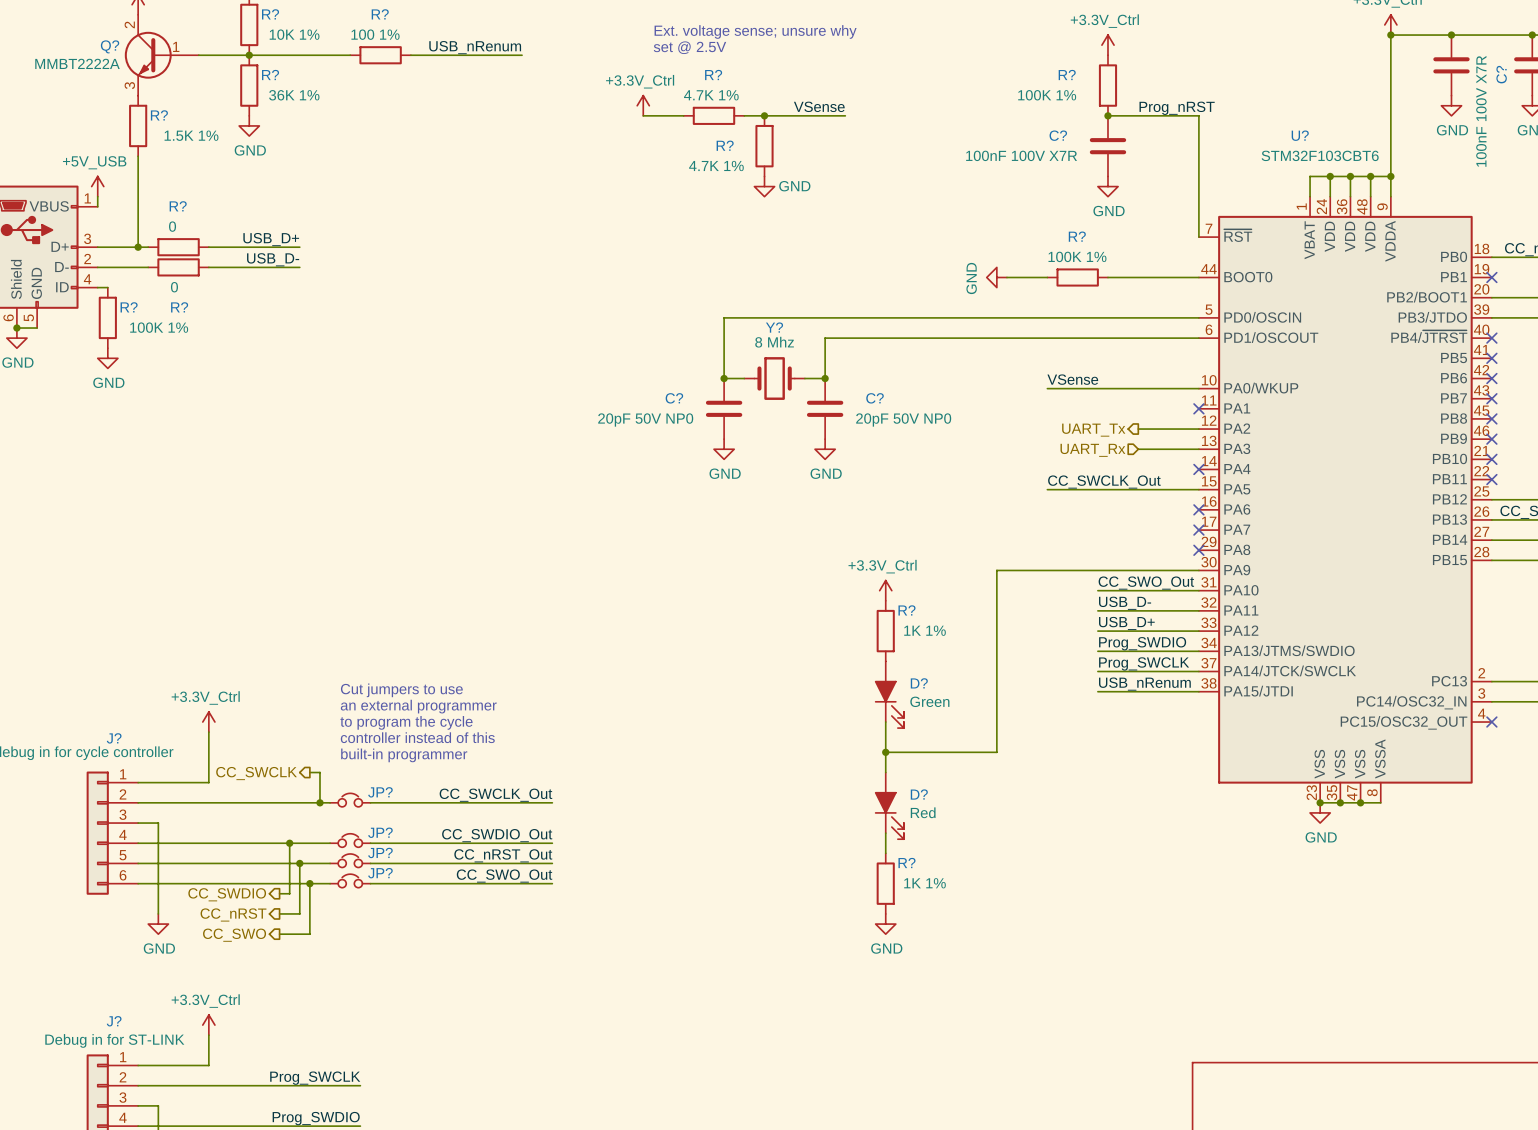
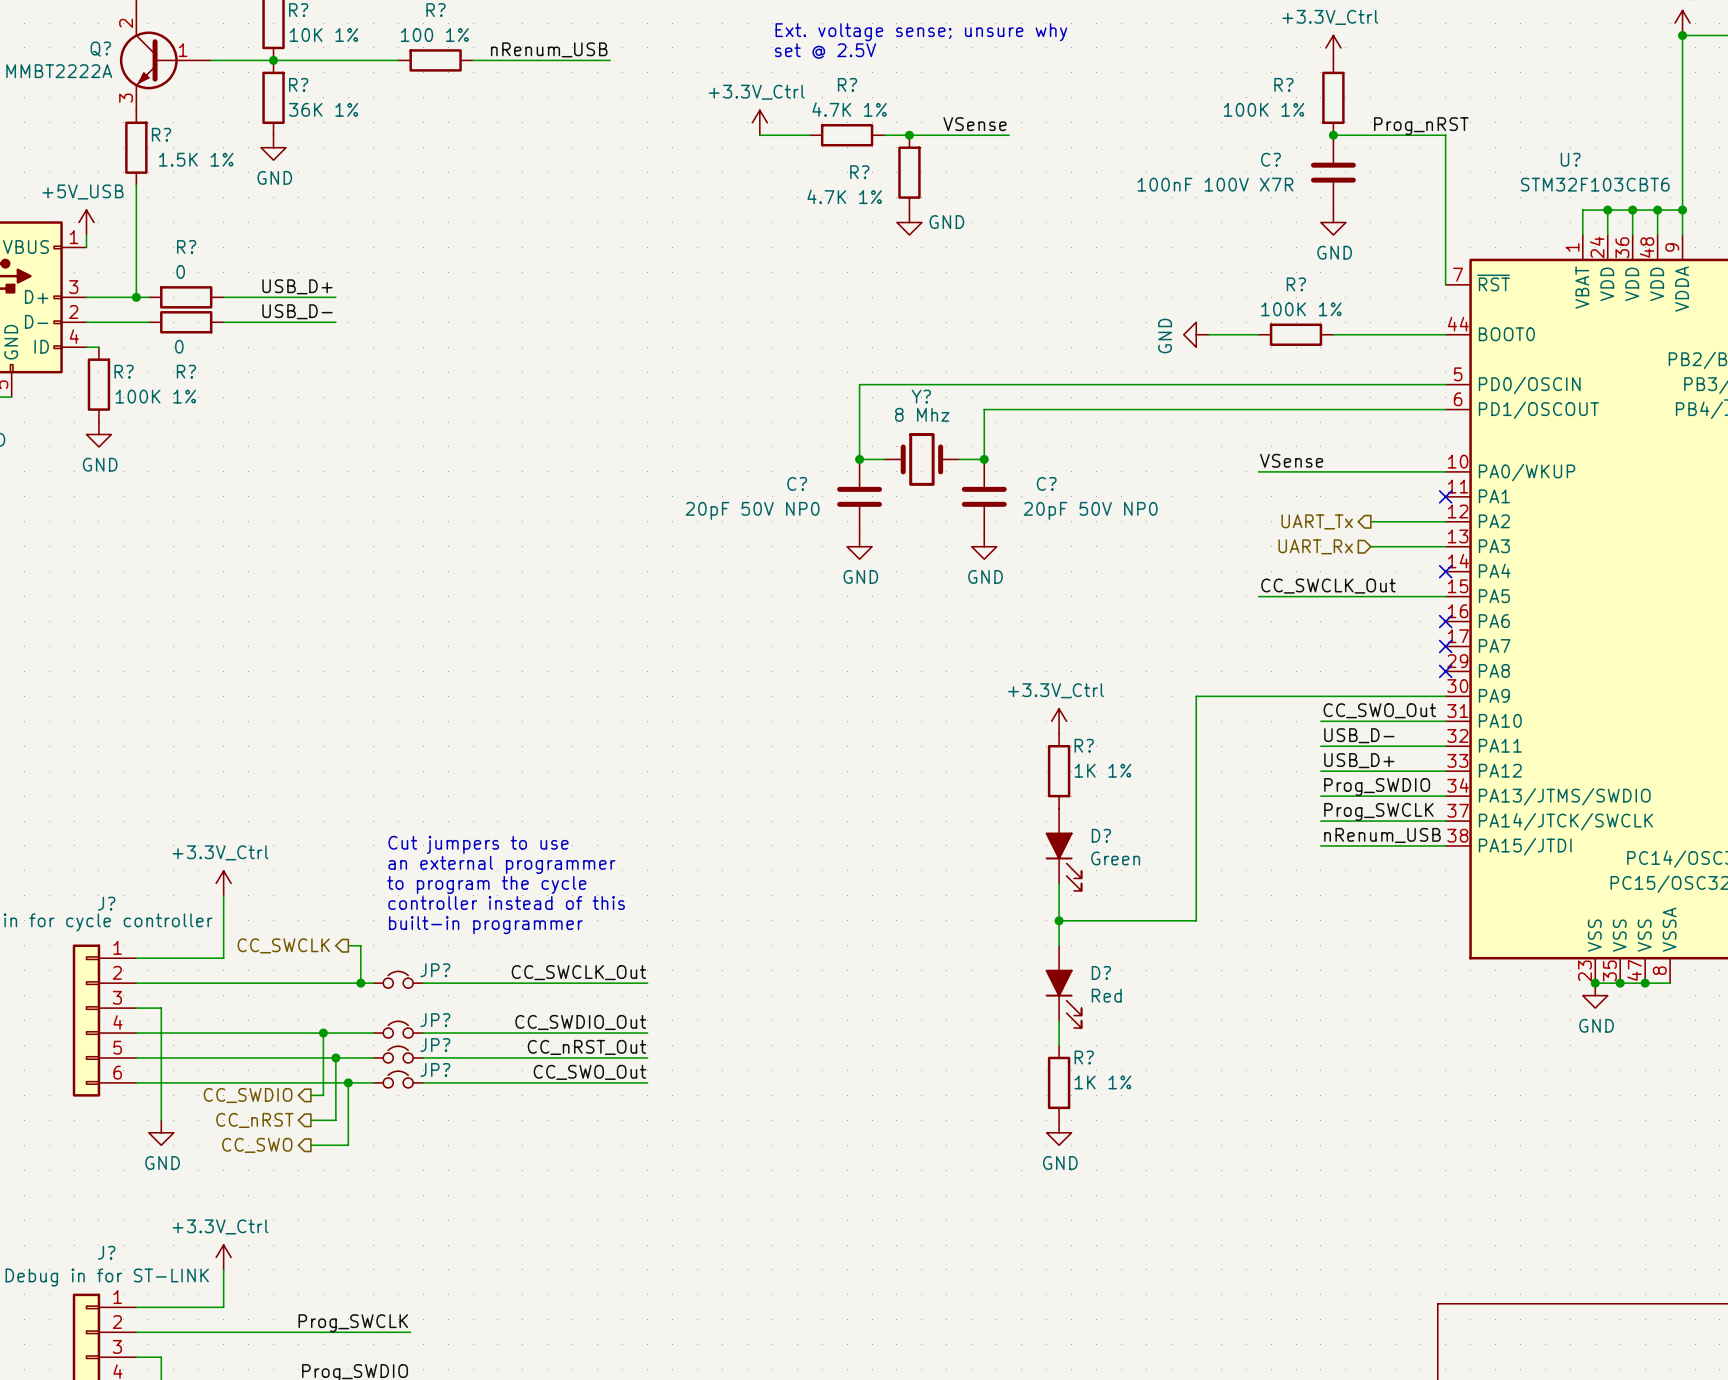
label: USB_nRenum (475, 47) -> nRenum_USB (549, 49)
label: USB_nRenum (1144, 684) -> nRenum_USB (1382, 835)

